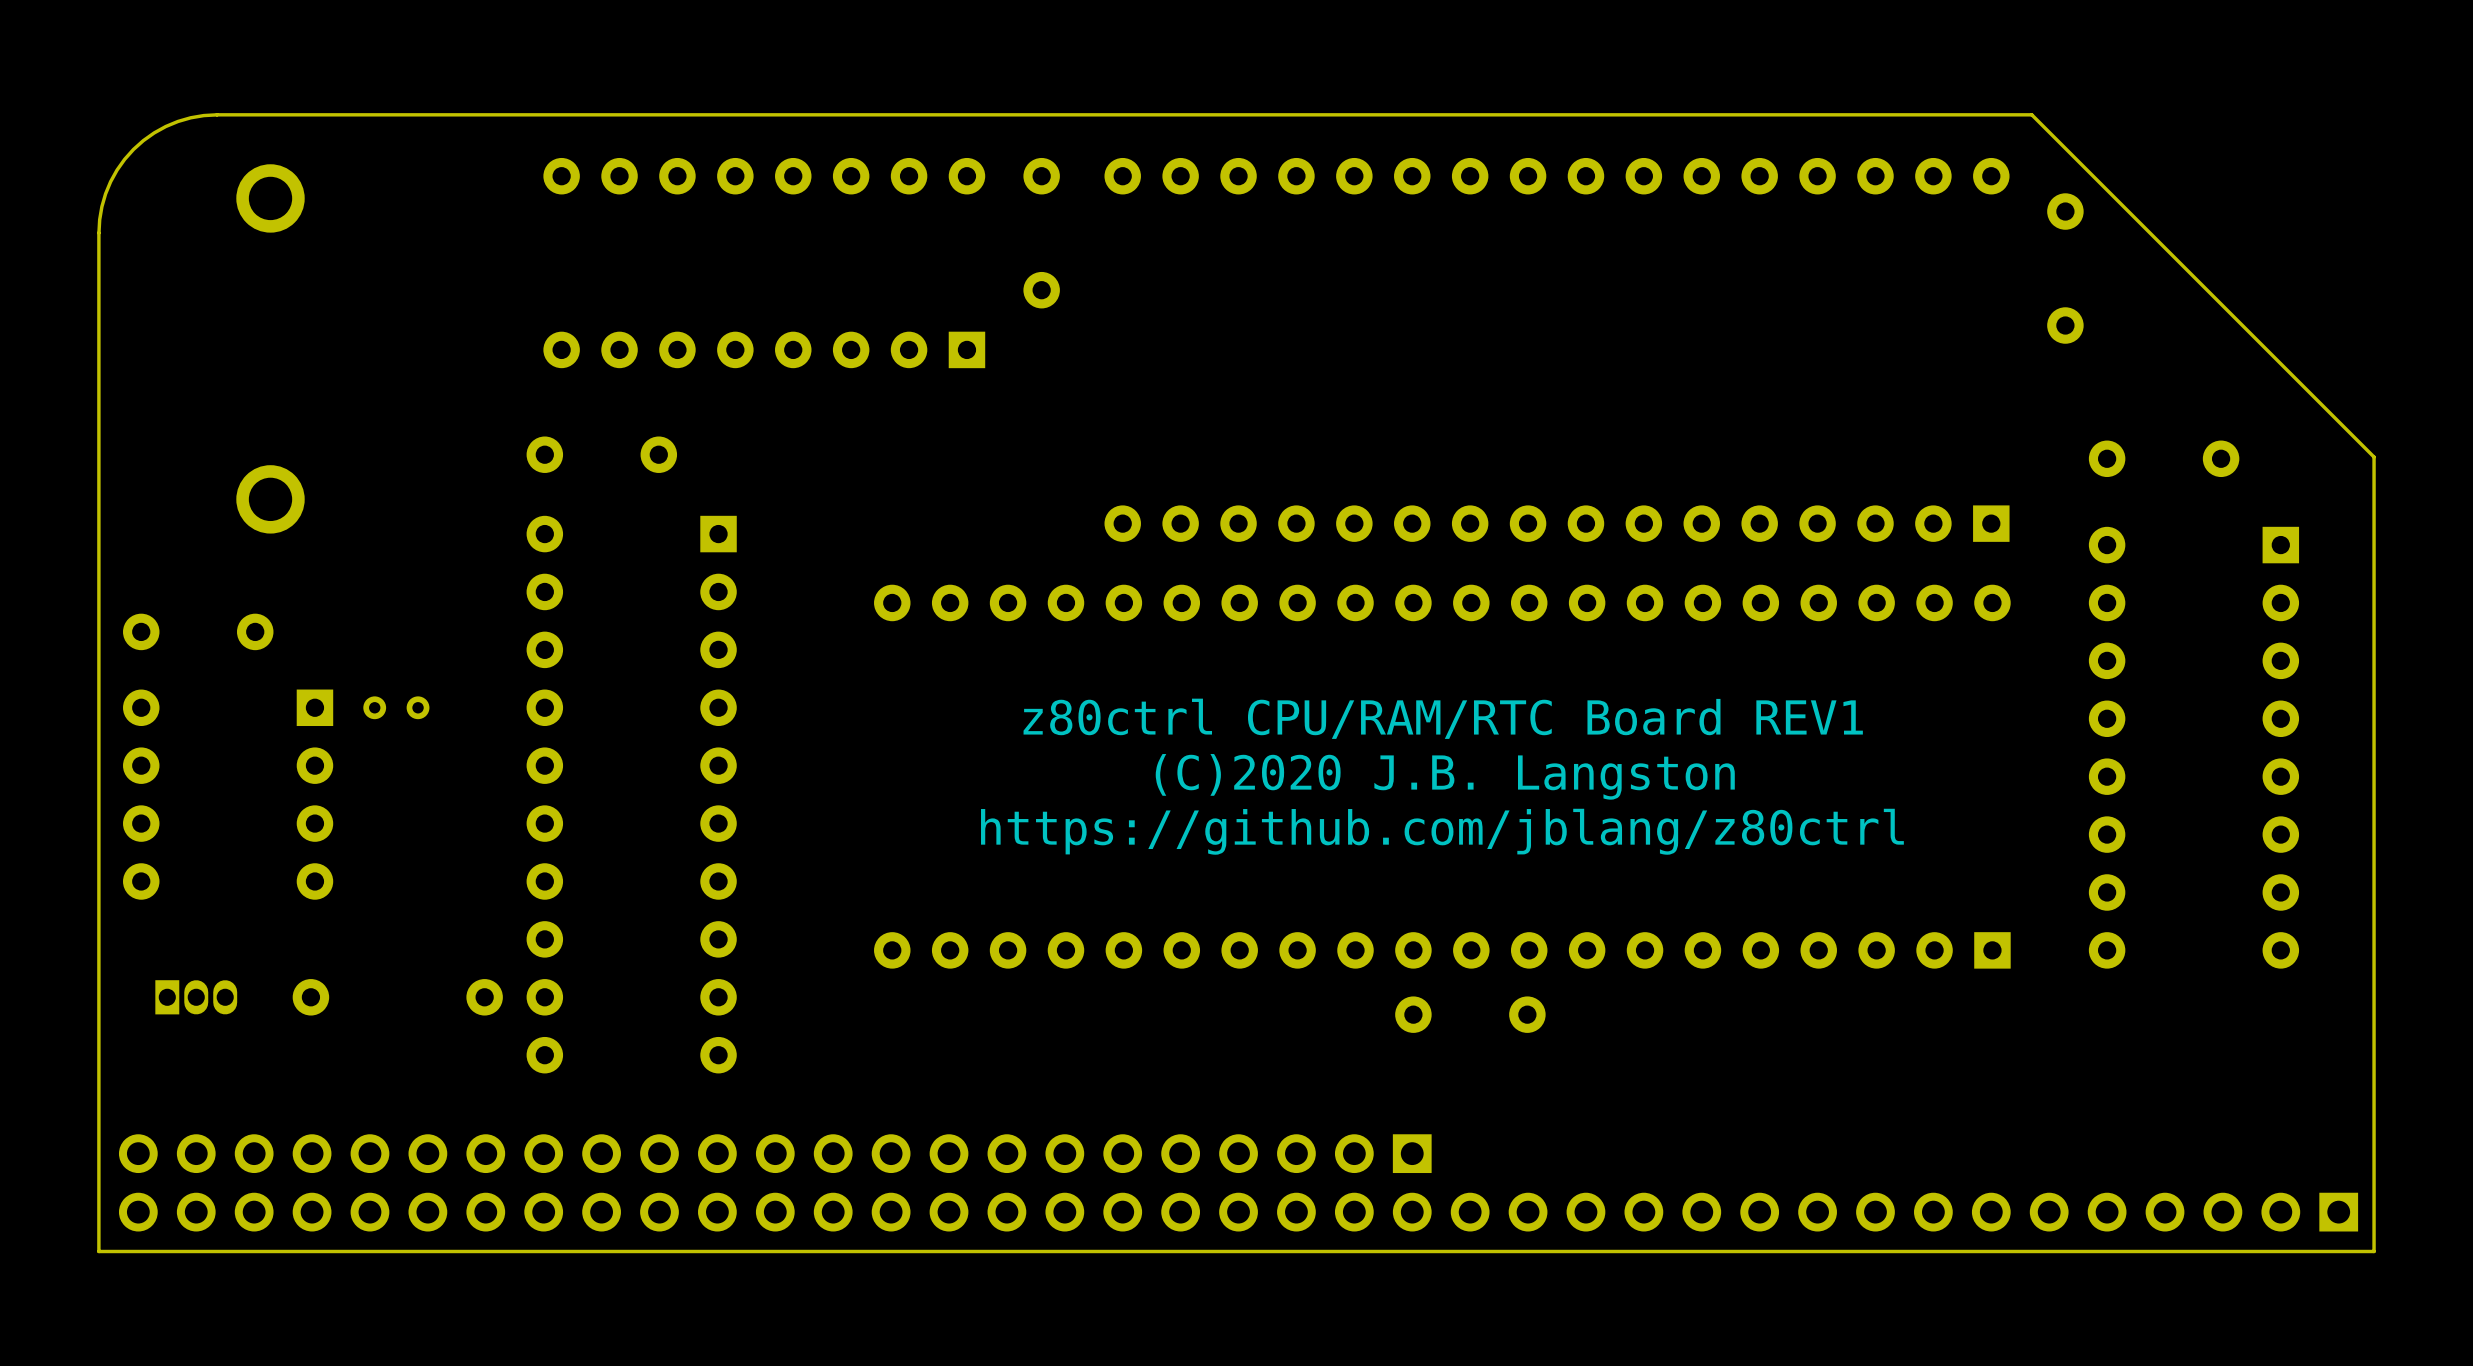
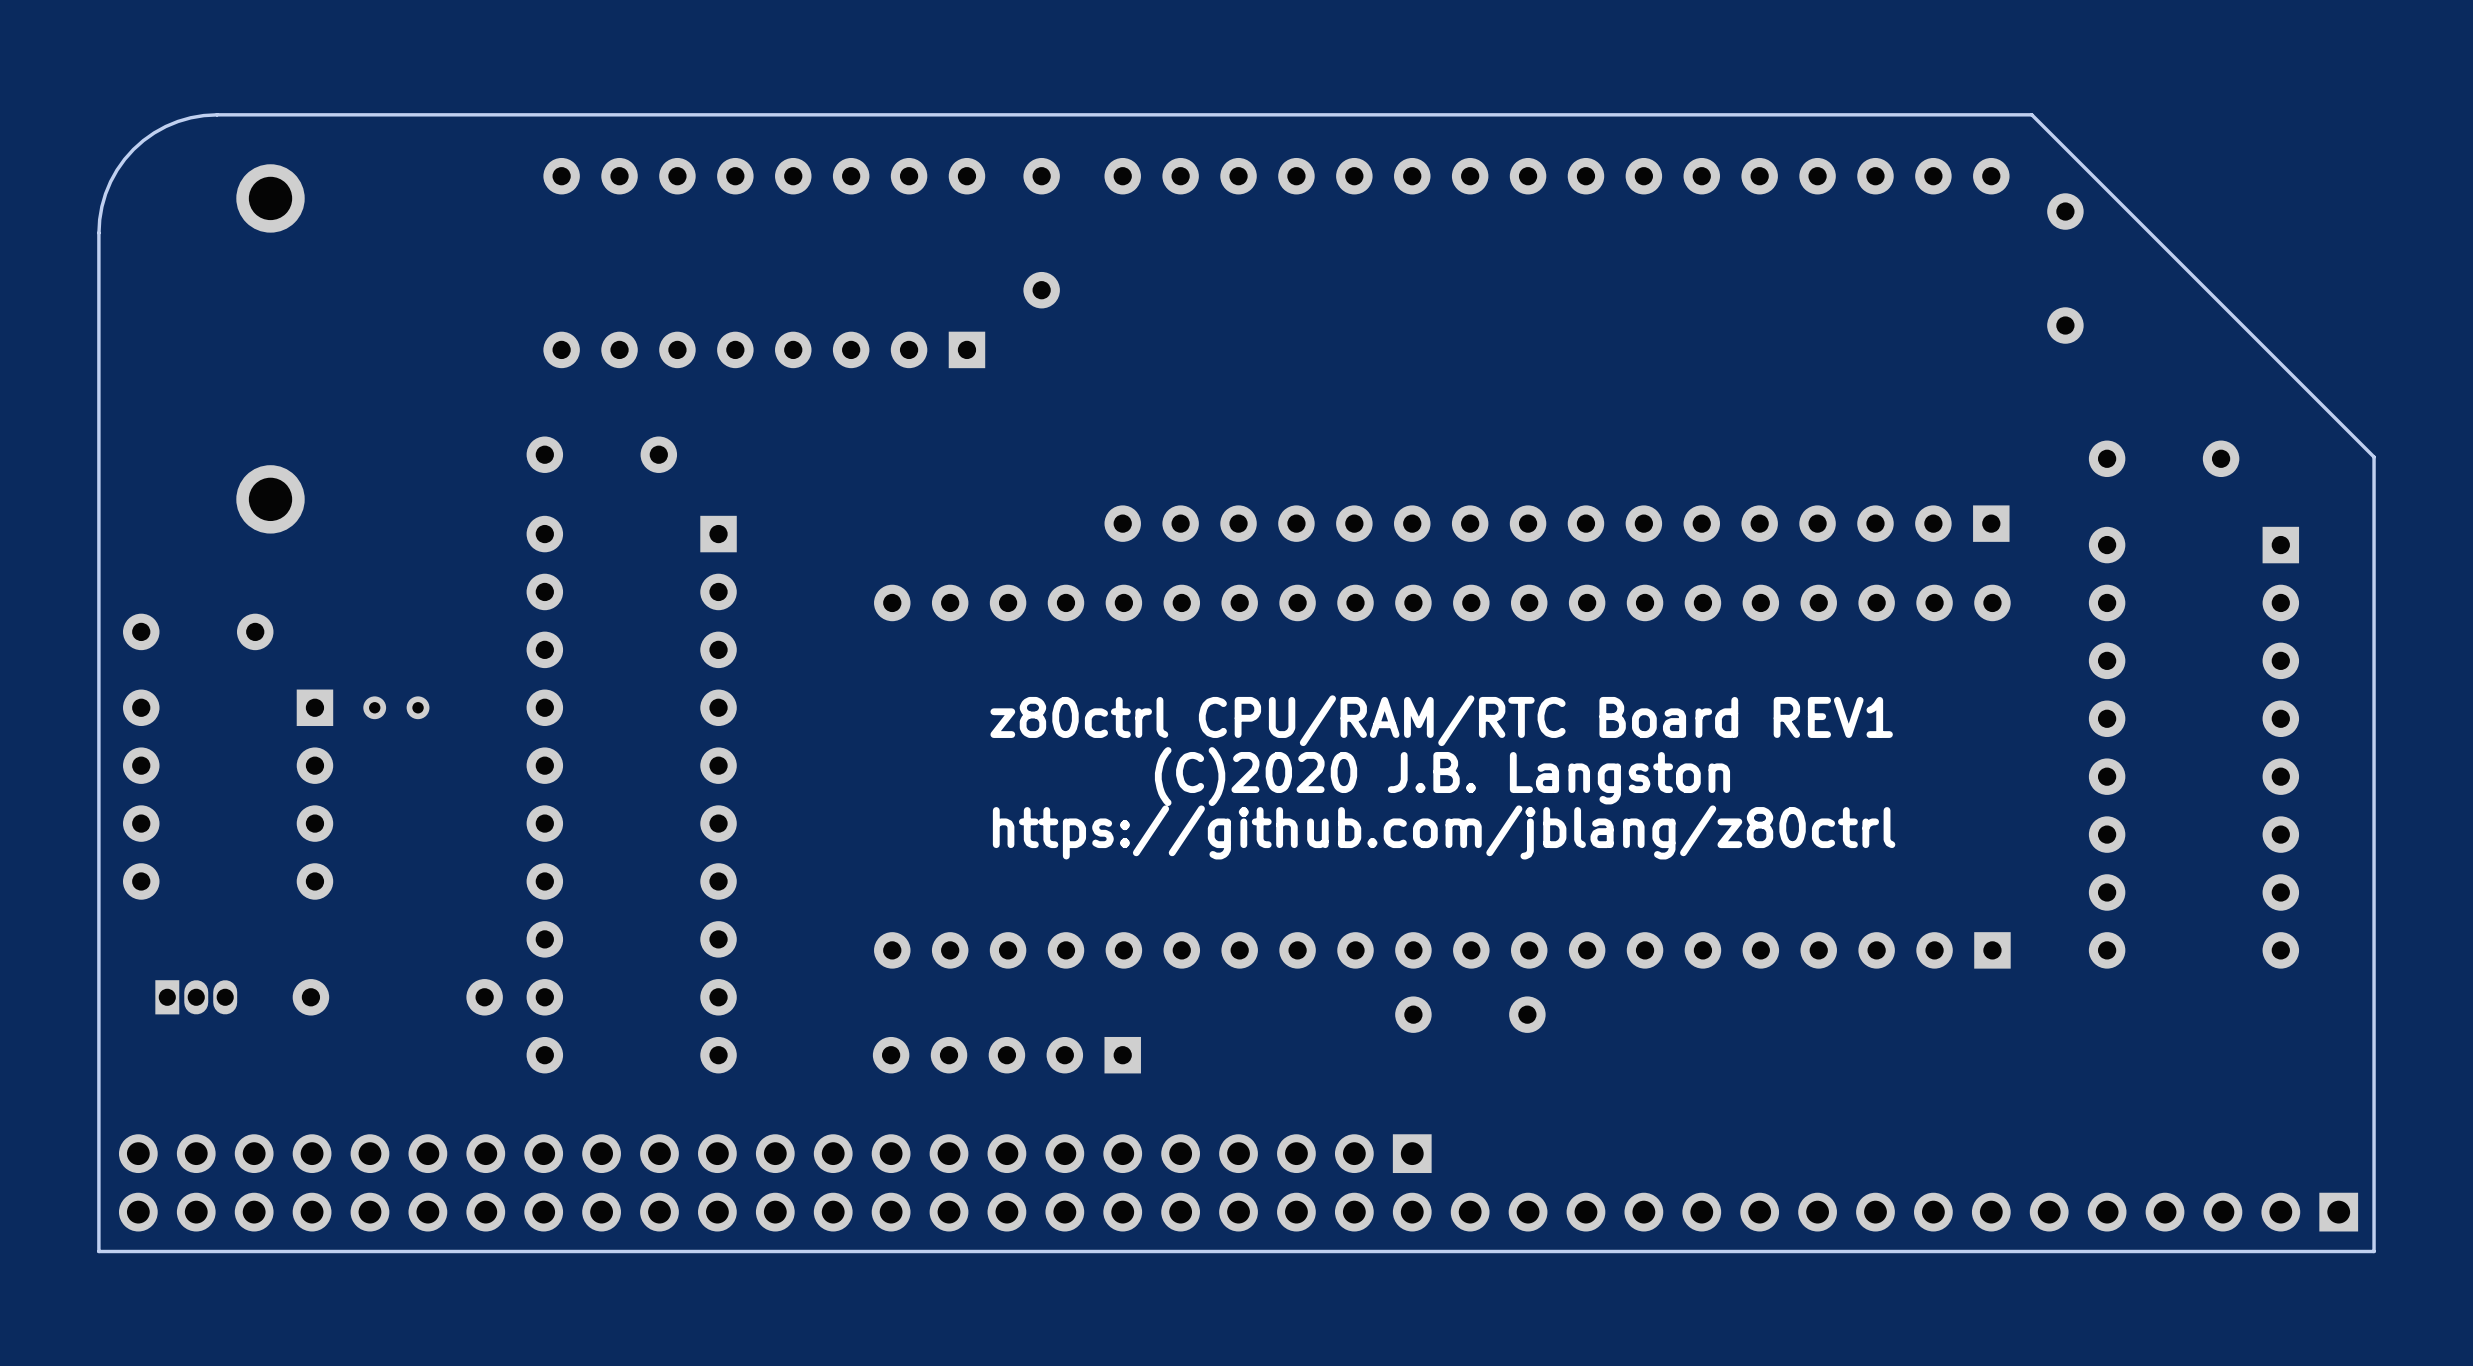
part: none -> (1006, 1055)

